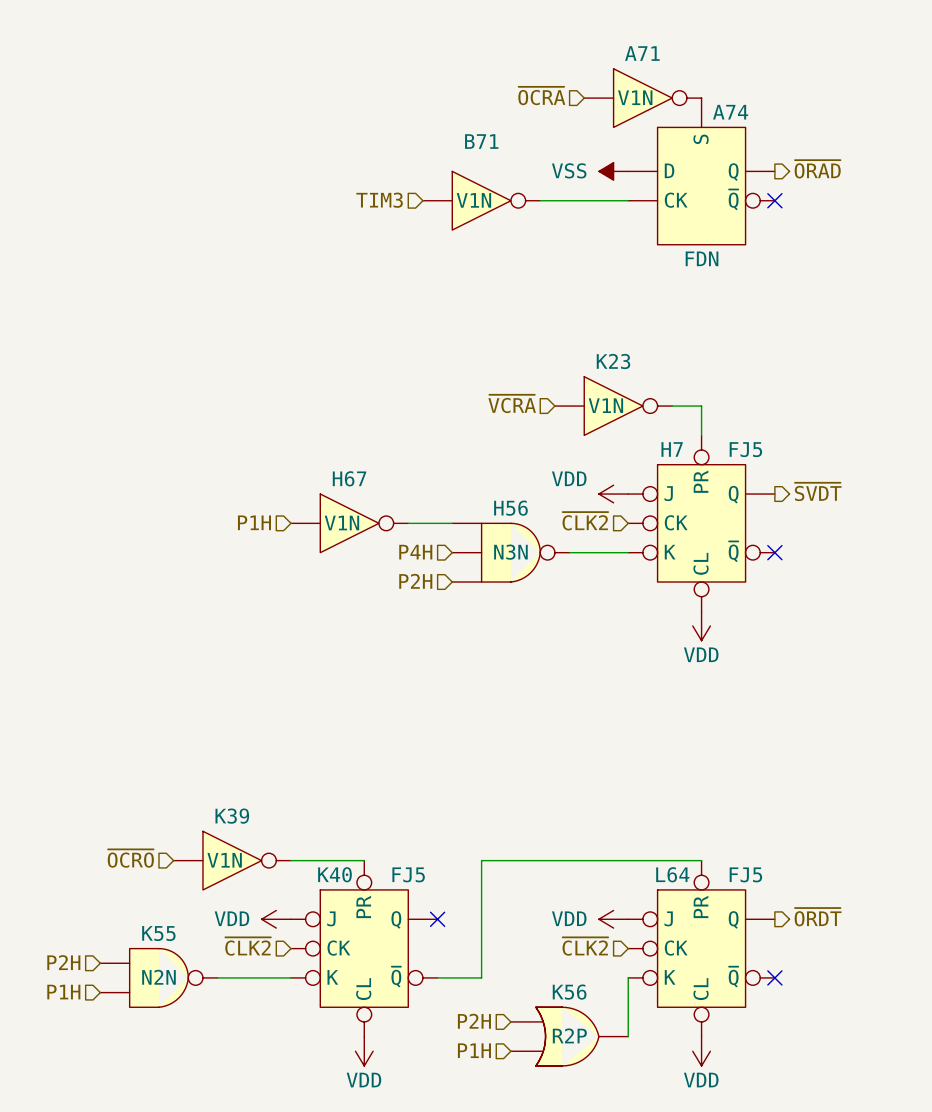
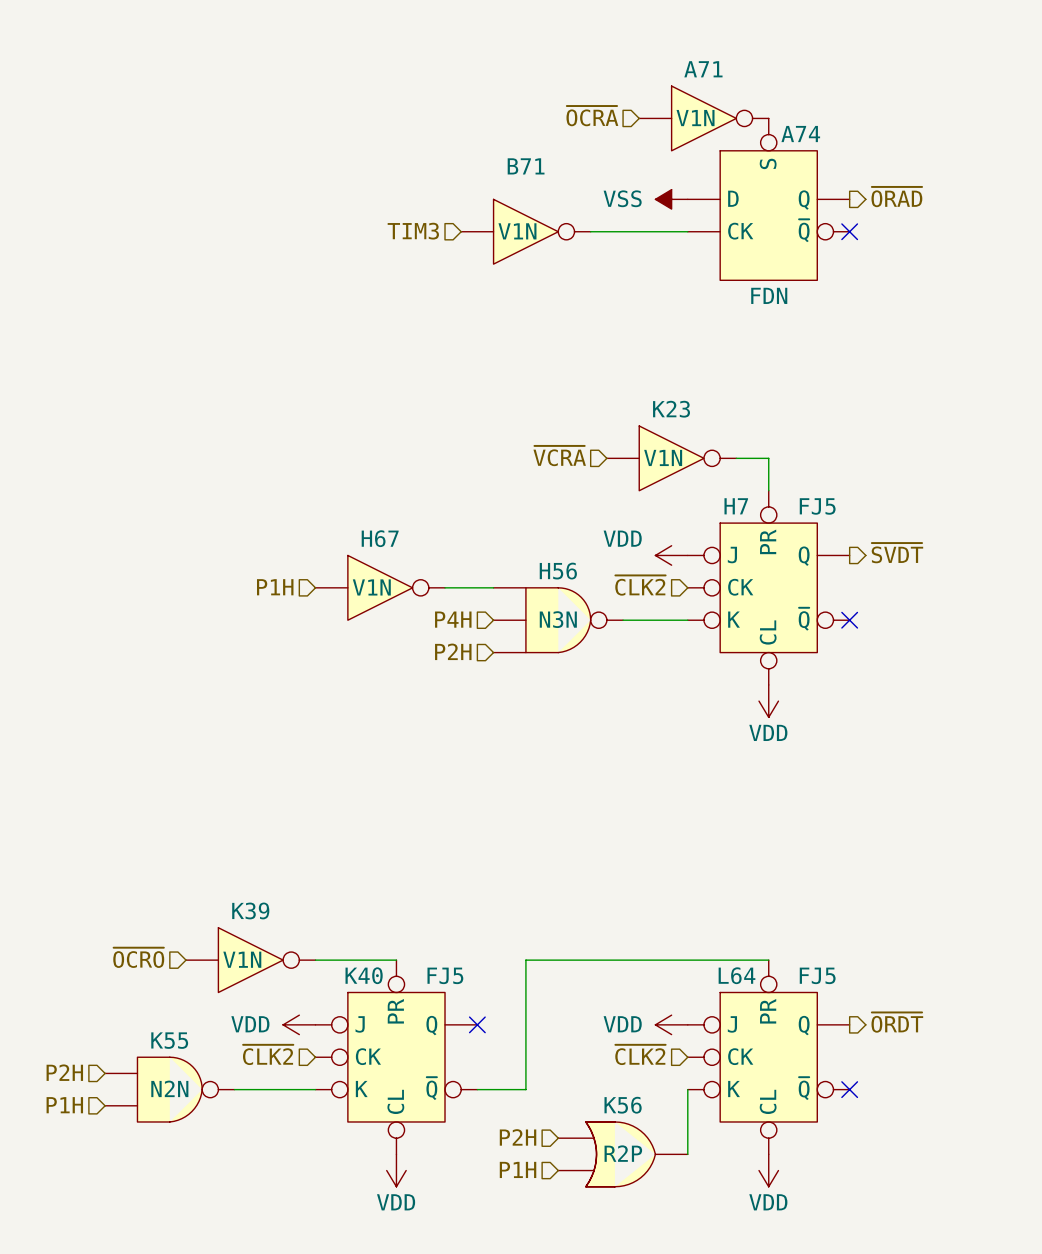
A74 symbol: [628, 98, 775, 245] -> [687, 118, 850, 281]

